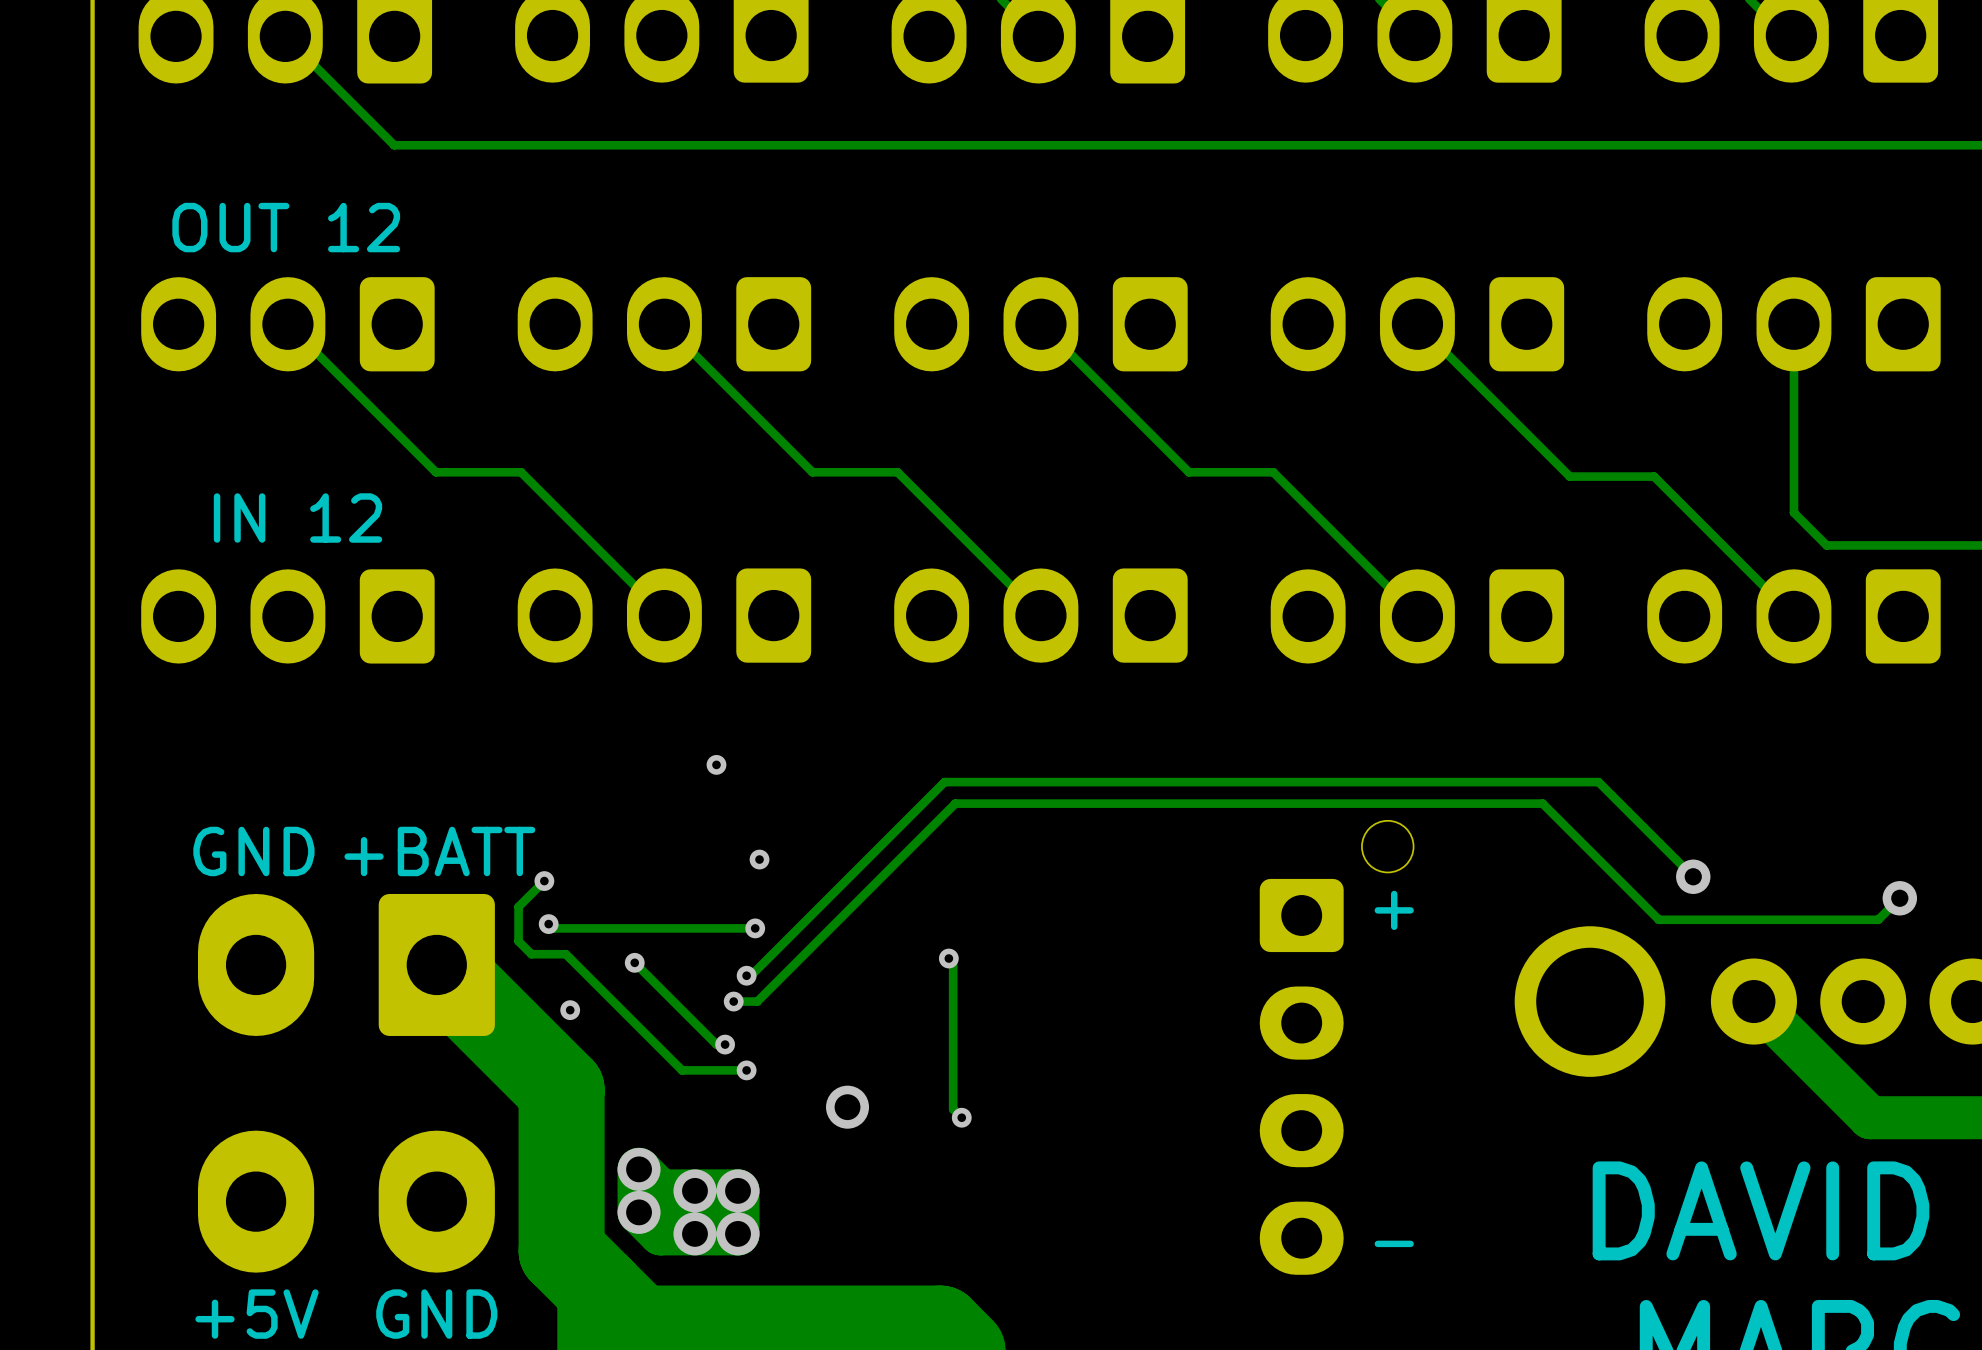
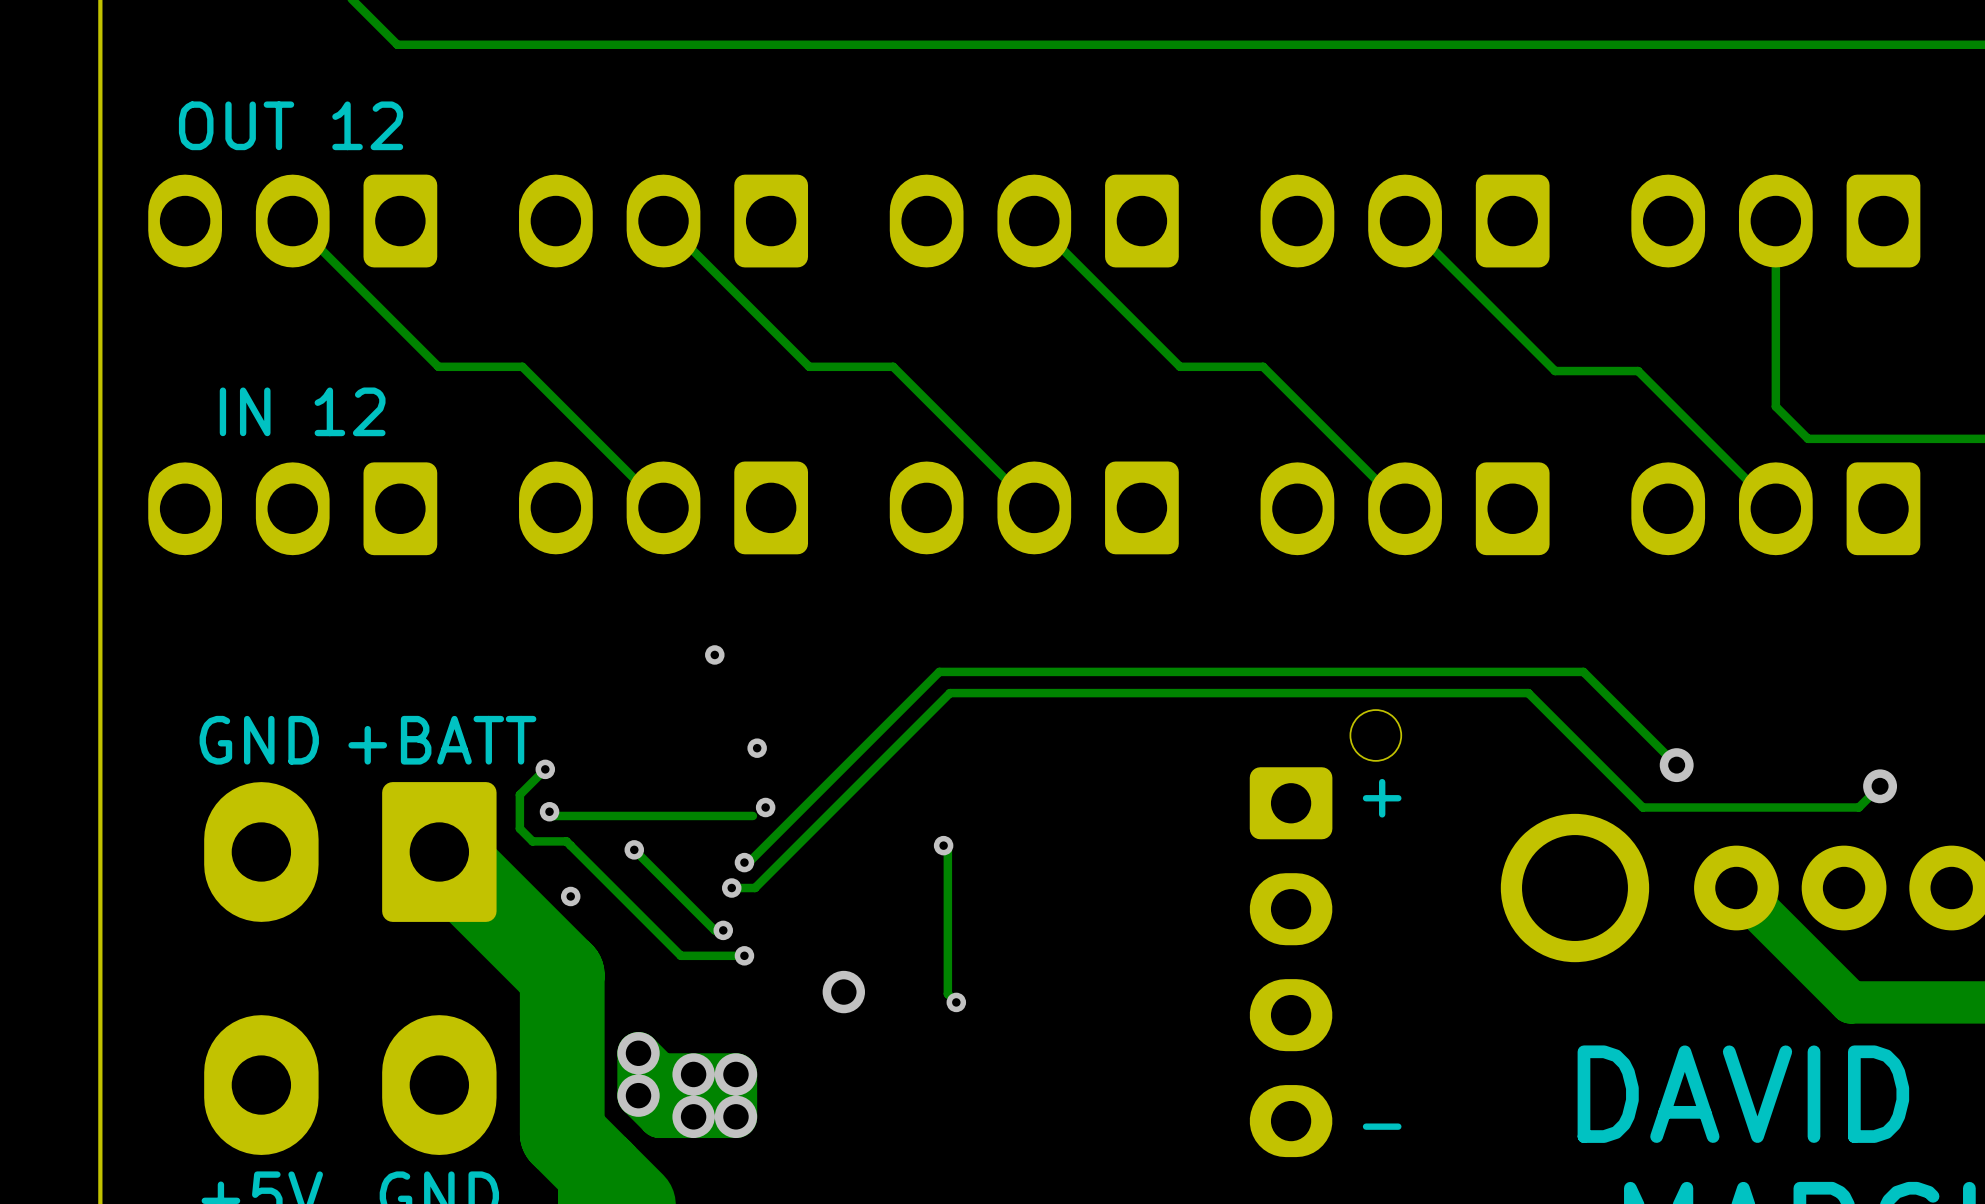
via position: (755, 928) -> (765, 807)

